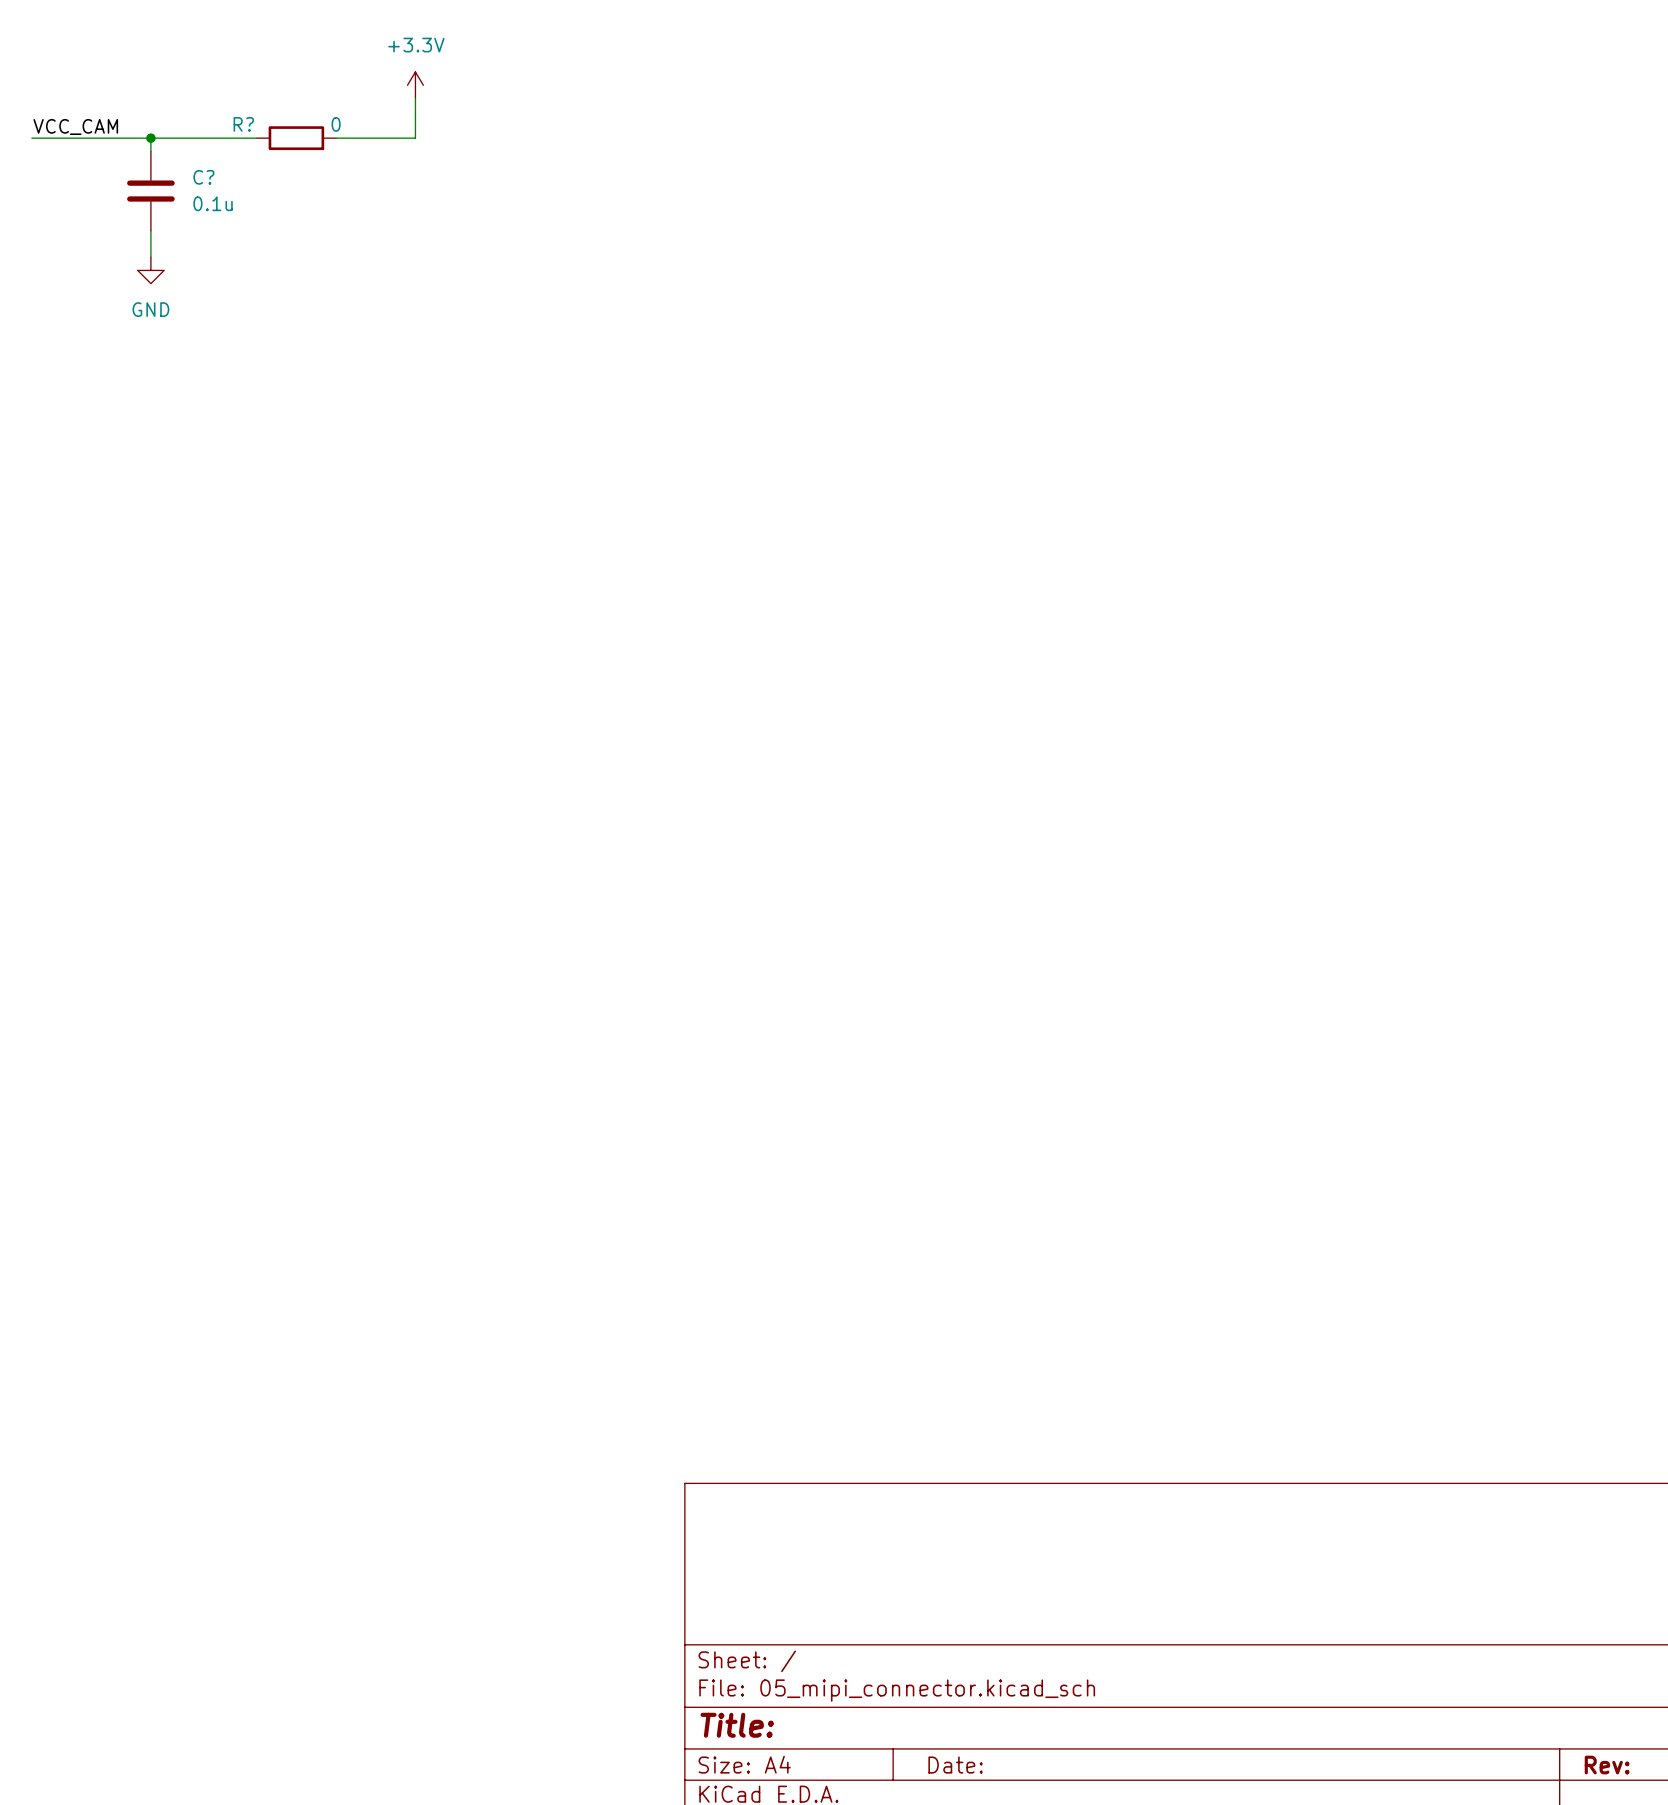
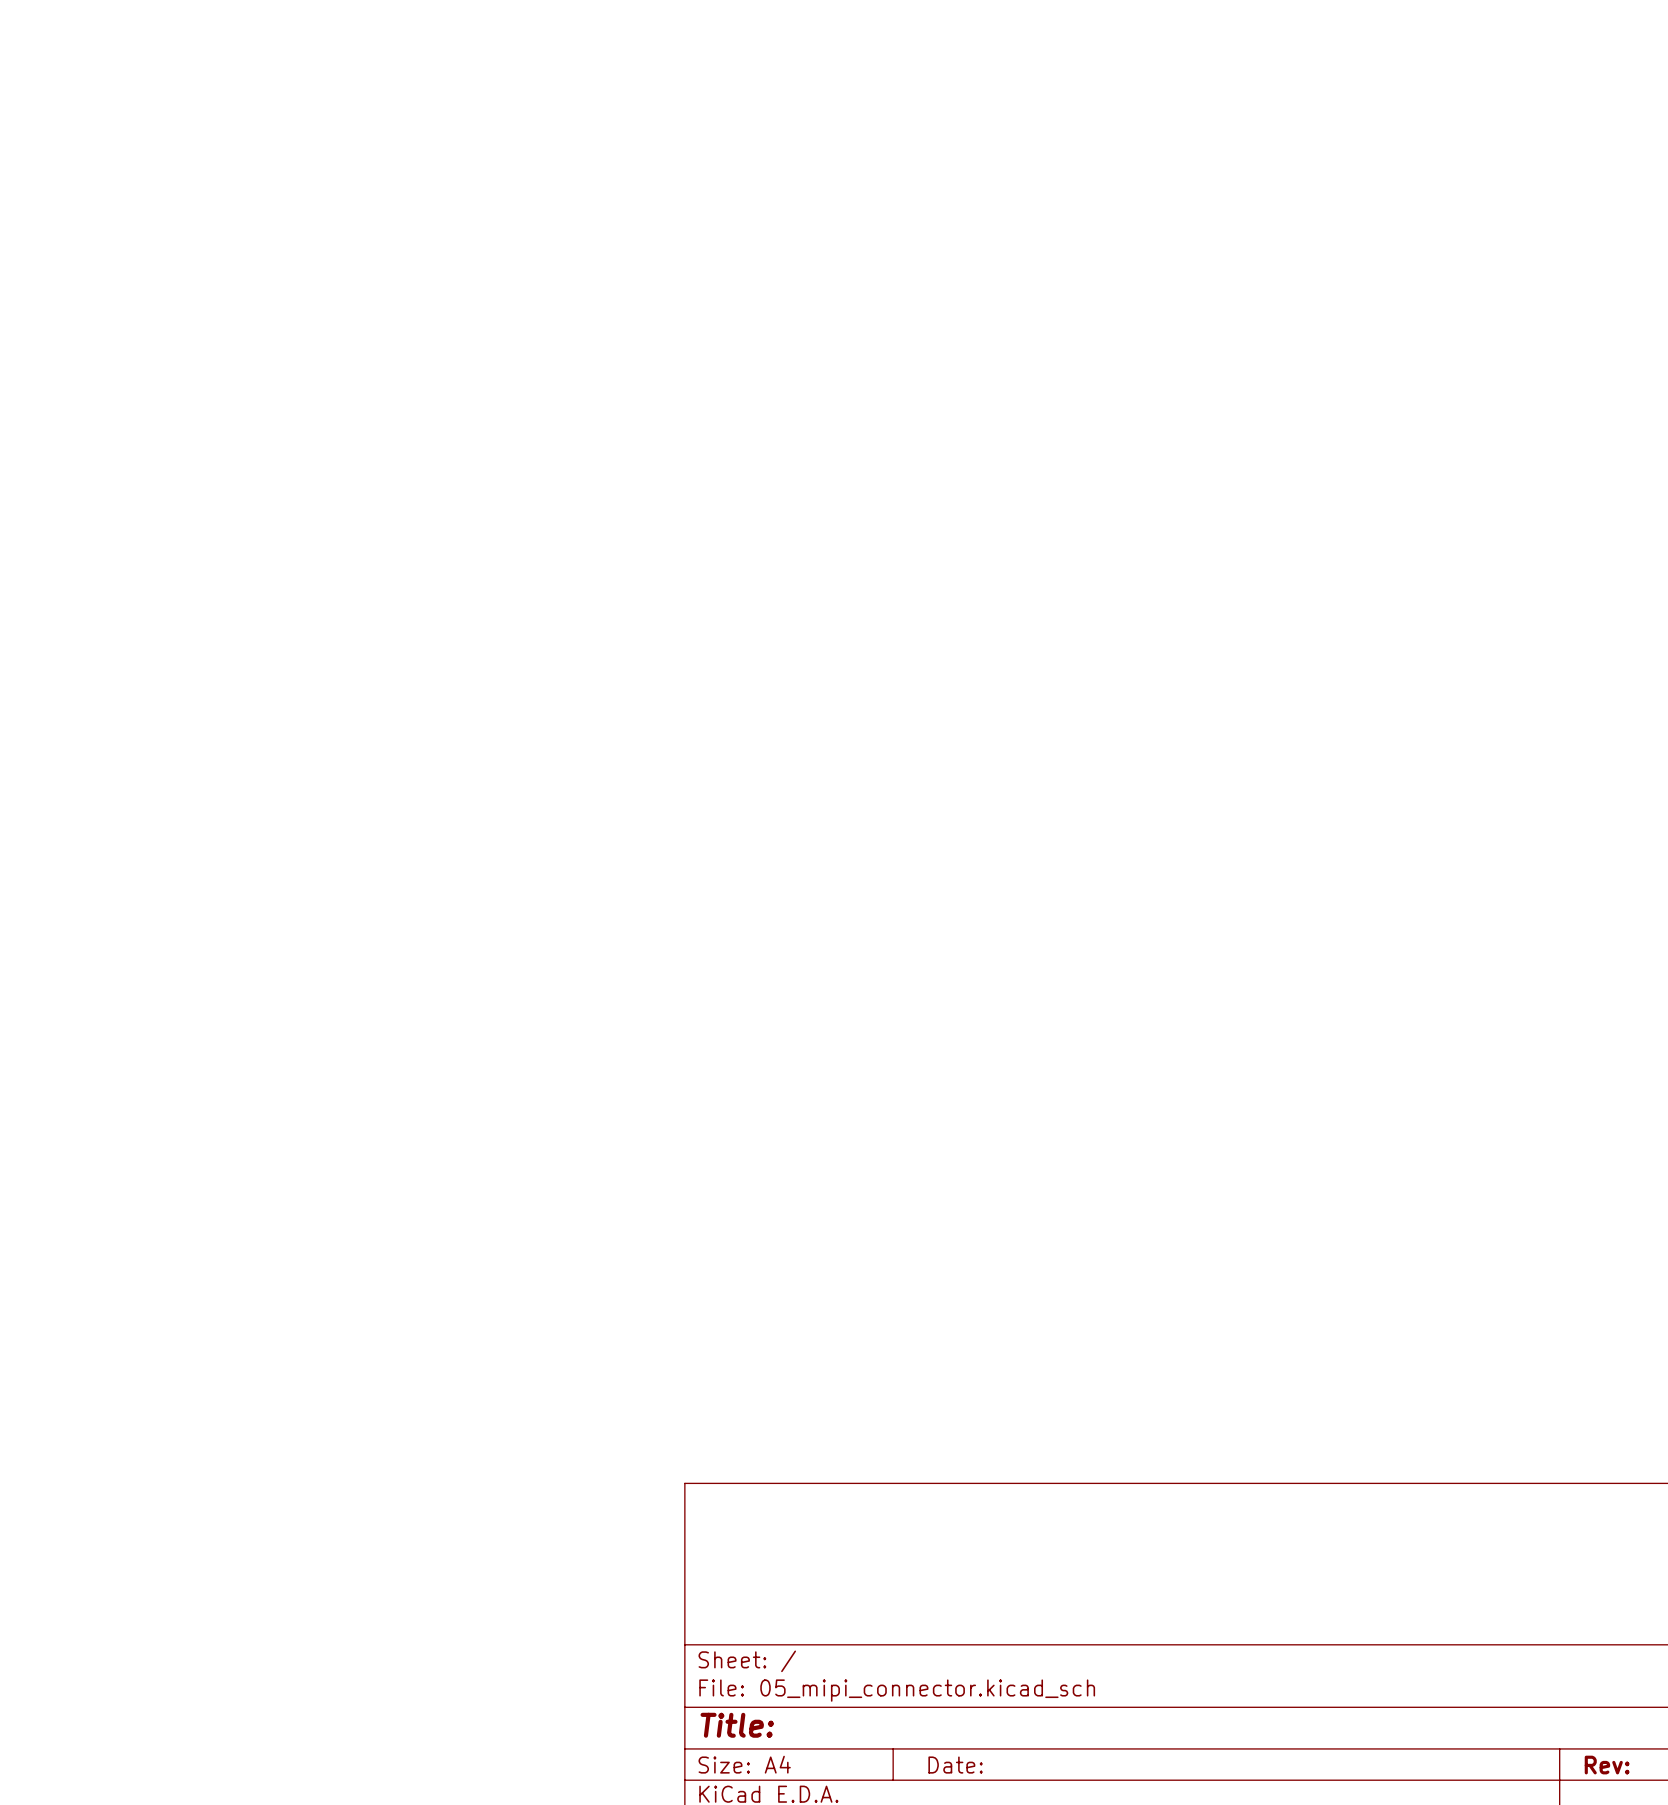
power symbol: +3.3V (415, 85) -> none
wire: (415, 98) (415, 138) (336, 138) -> none
label: VCC_CAM (75, 126) -> none
wire: (31, 138) (256, 138) -> none
wire: (150, 138) (150, 151) -> none
junction: (150, 138) -> none
R?: 0 (296, 138) -> none
C?: 0.1u (150, 191) -> none
wire: (150, 230) (150, 257) -> none
power symbol: GND (150, 270) -> none

